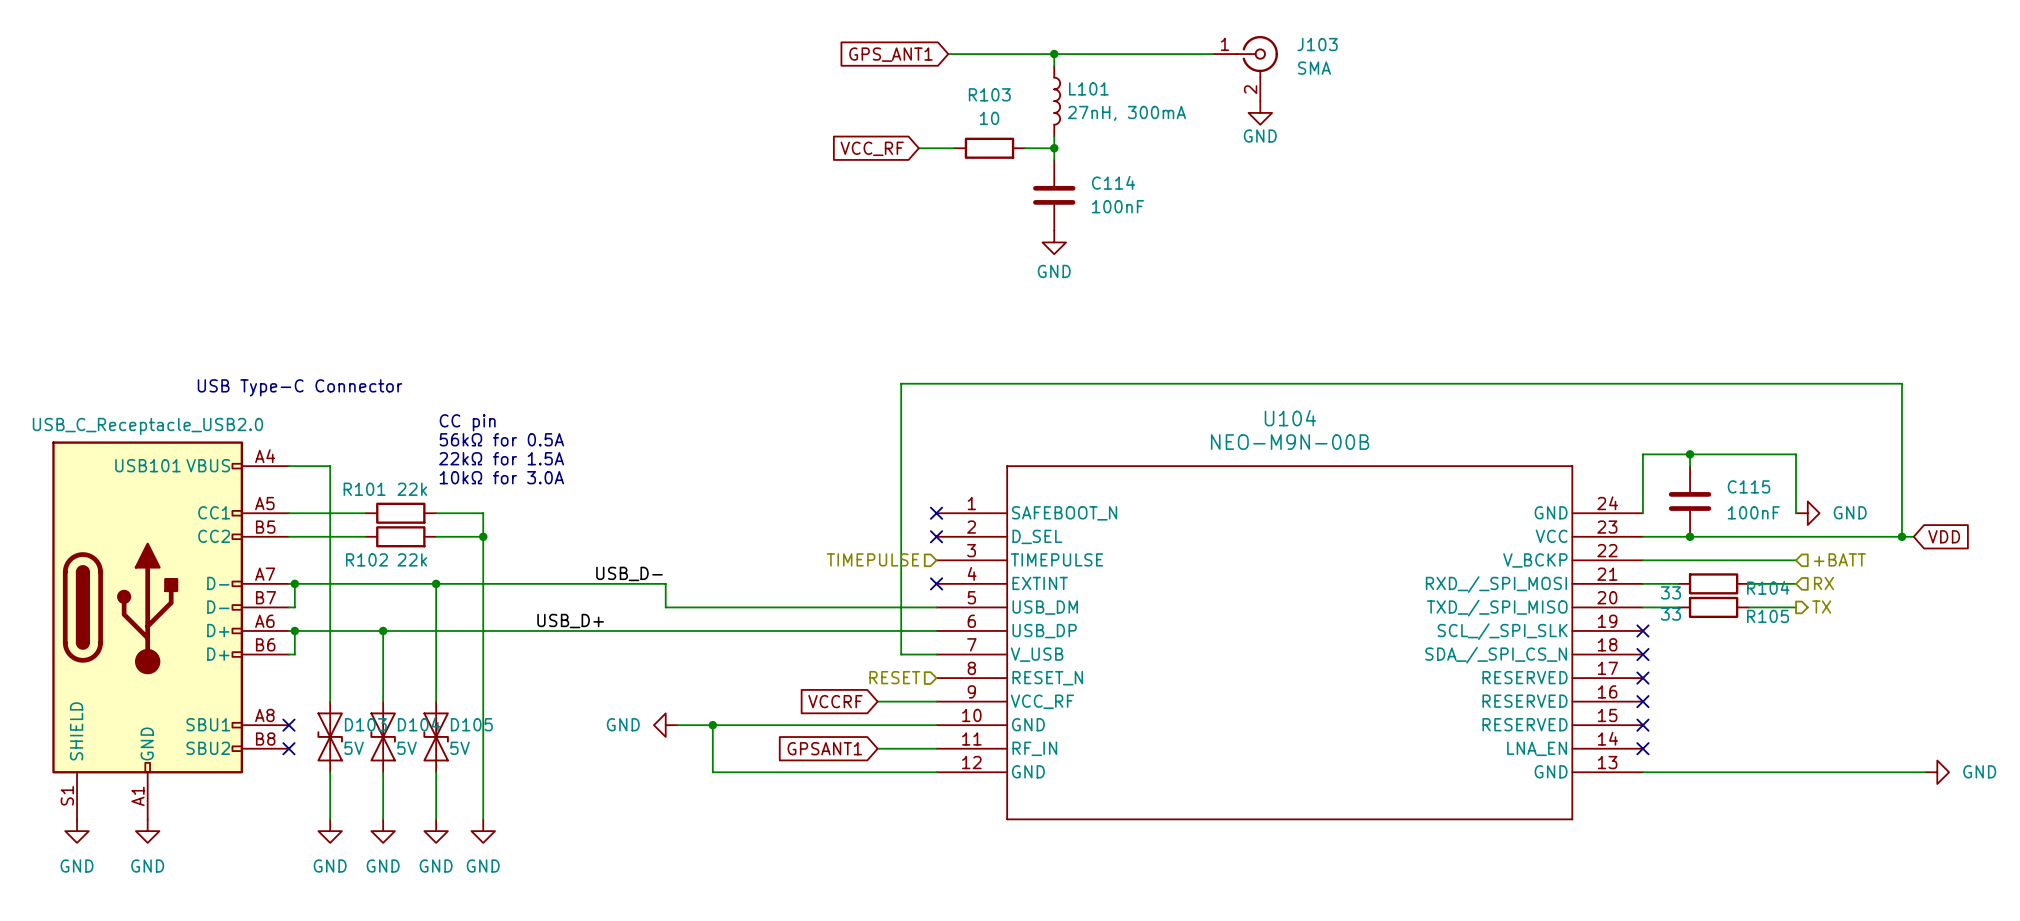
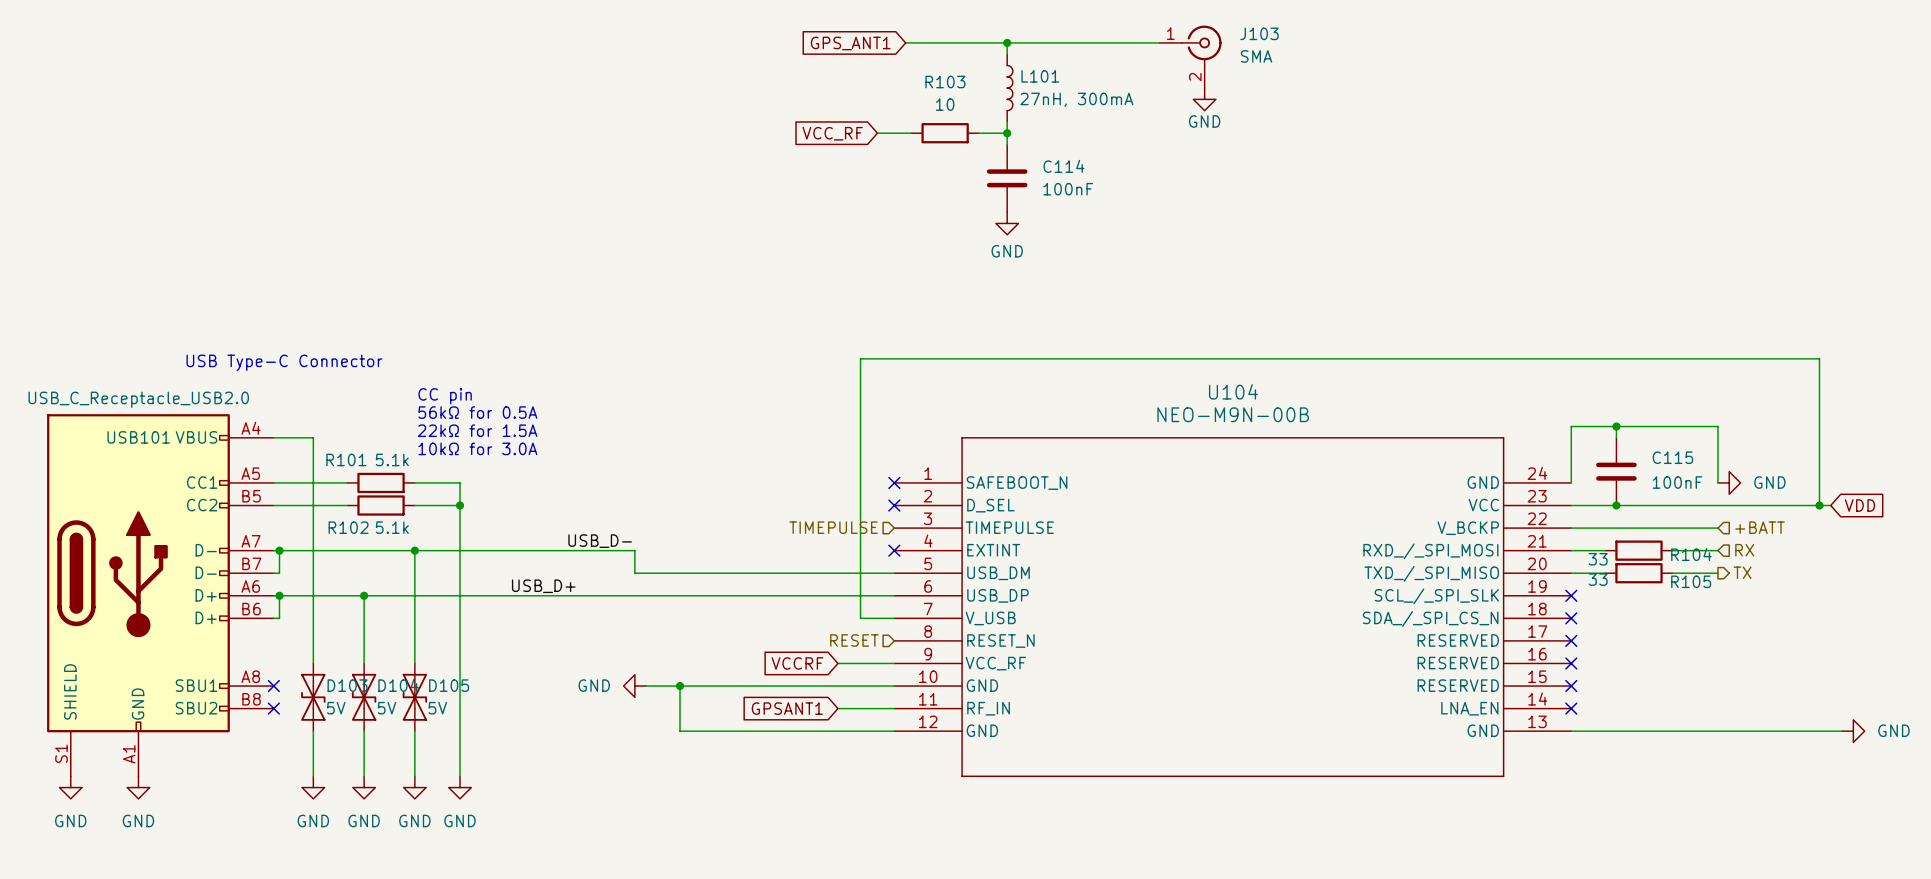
R101 value: 22k (412, 489) -> 5.1k (392, 459)
R102 value: 22k (412, 559) -> 5.1k (392, 527)

